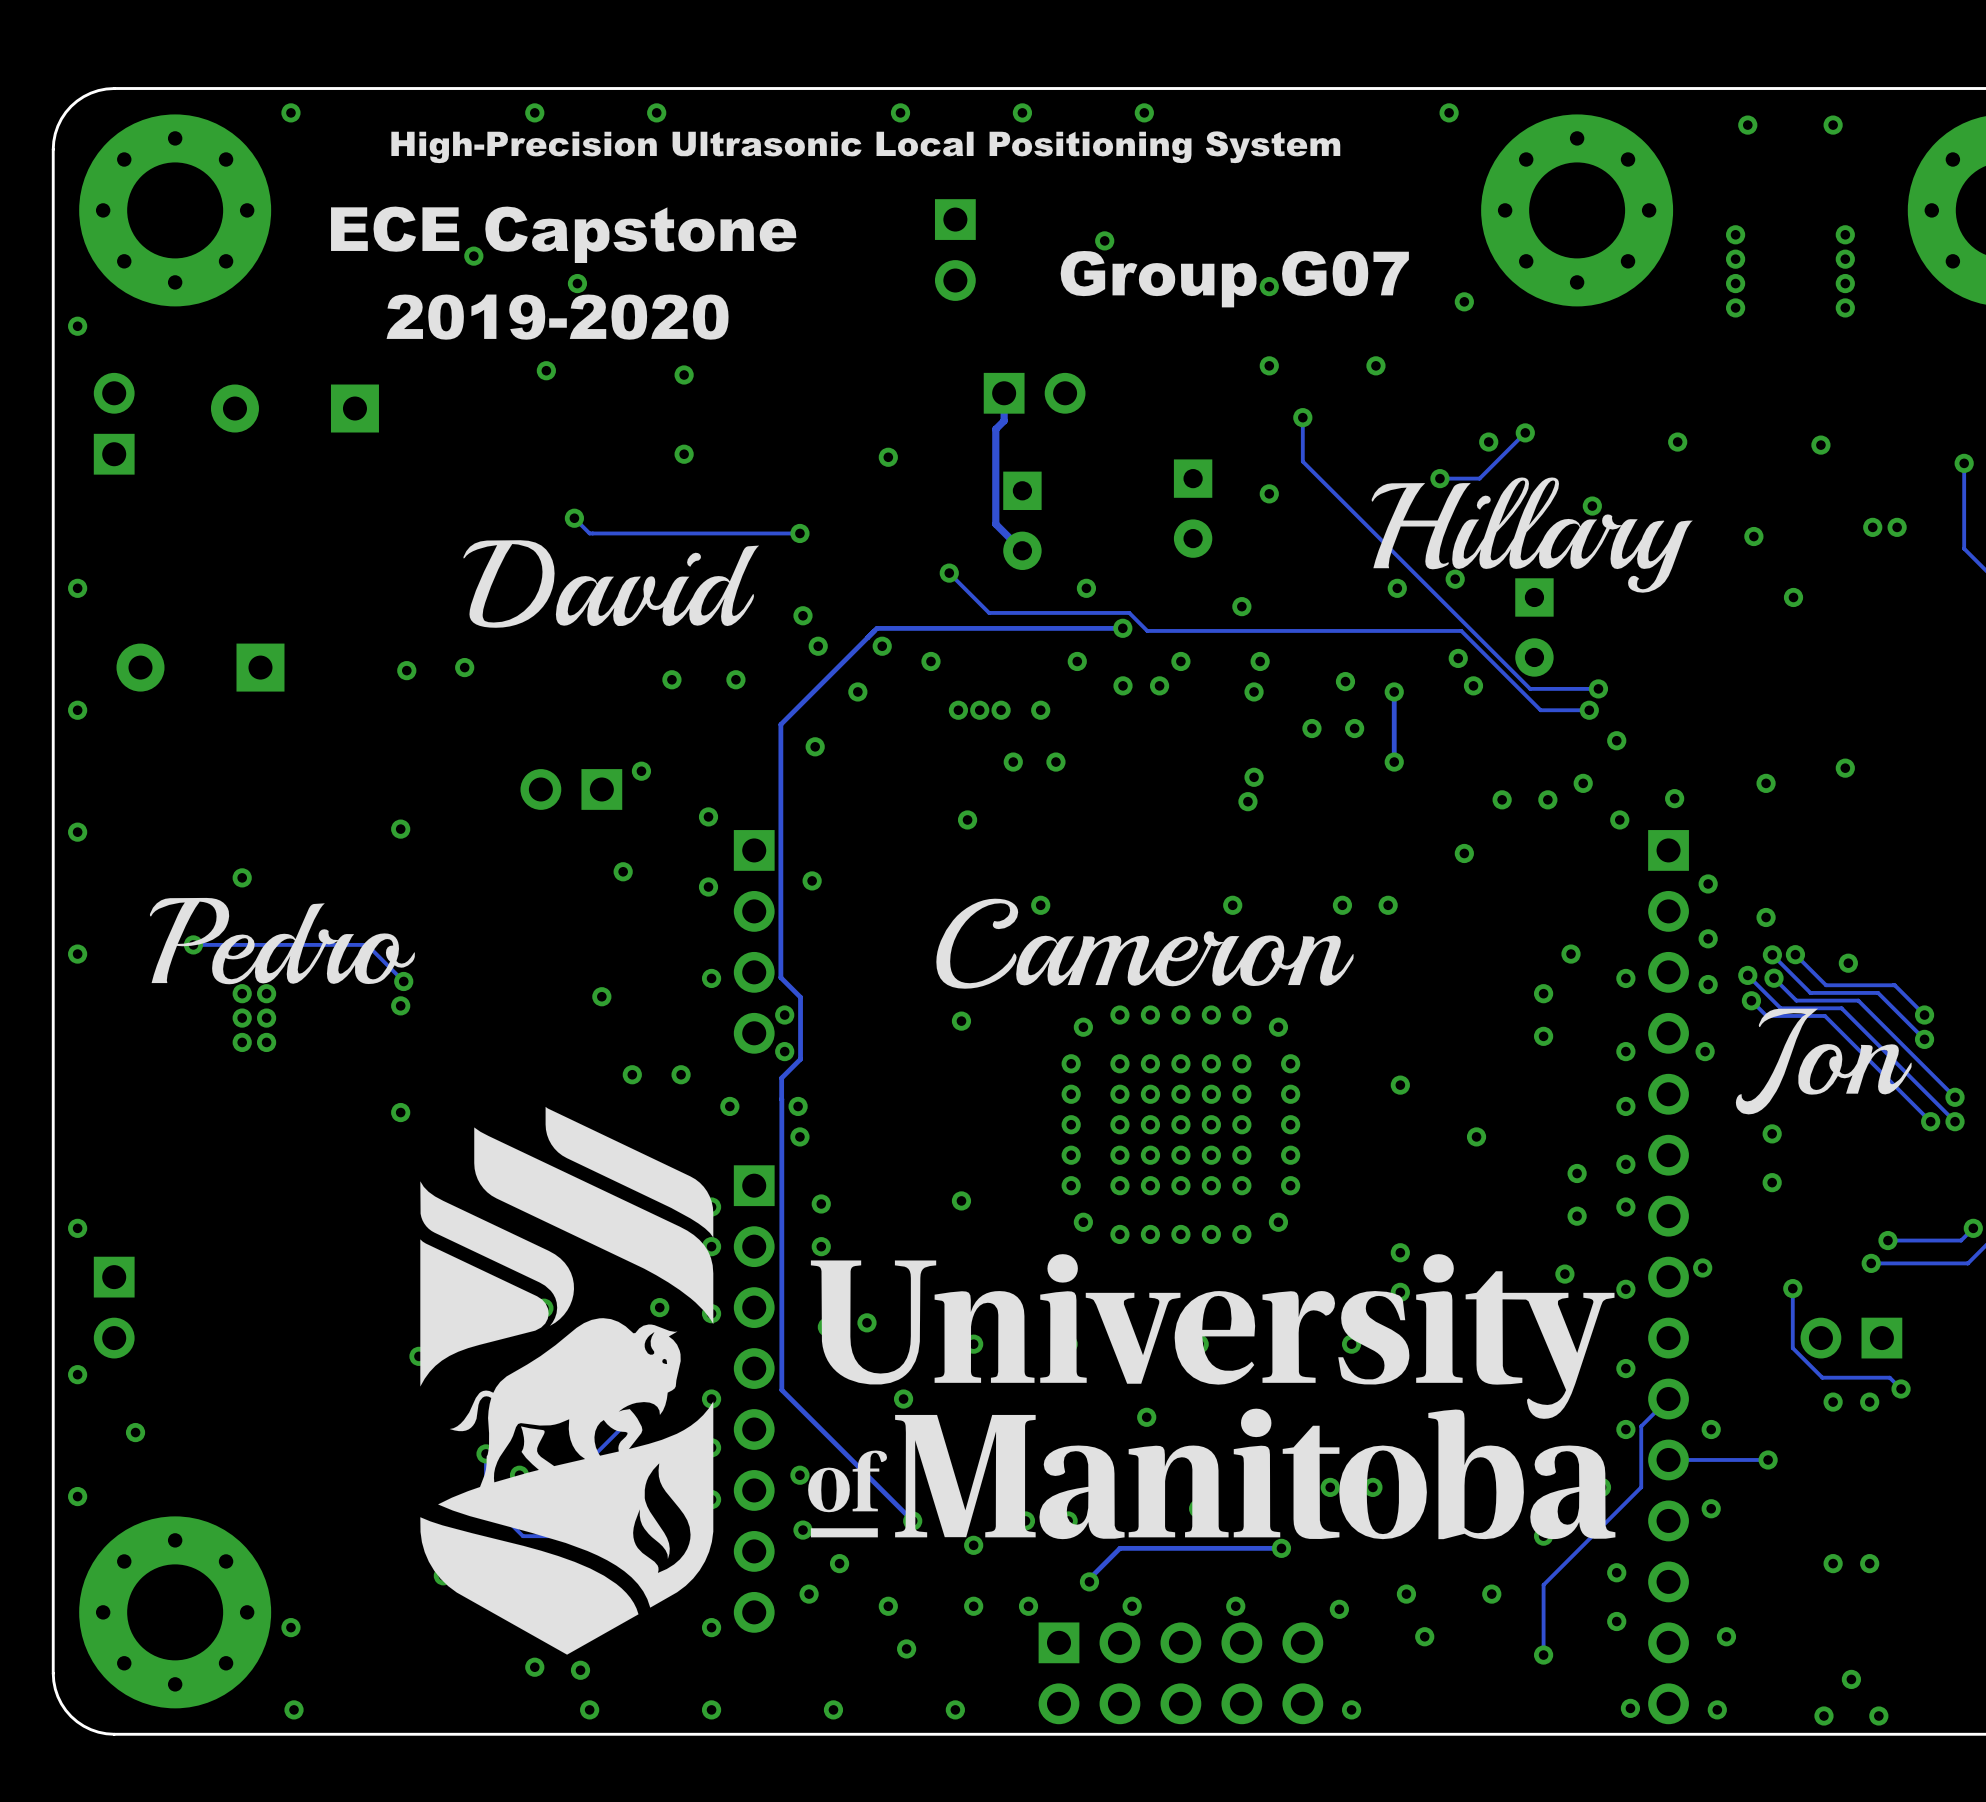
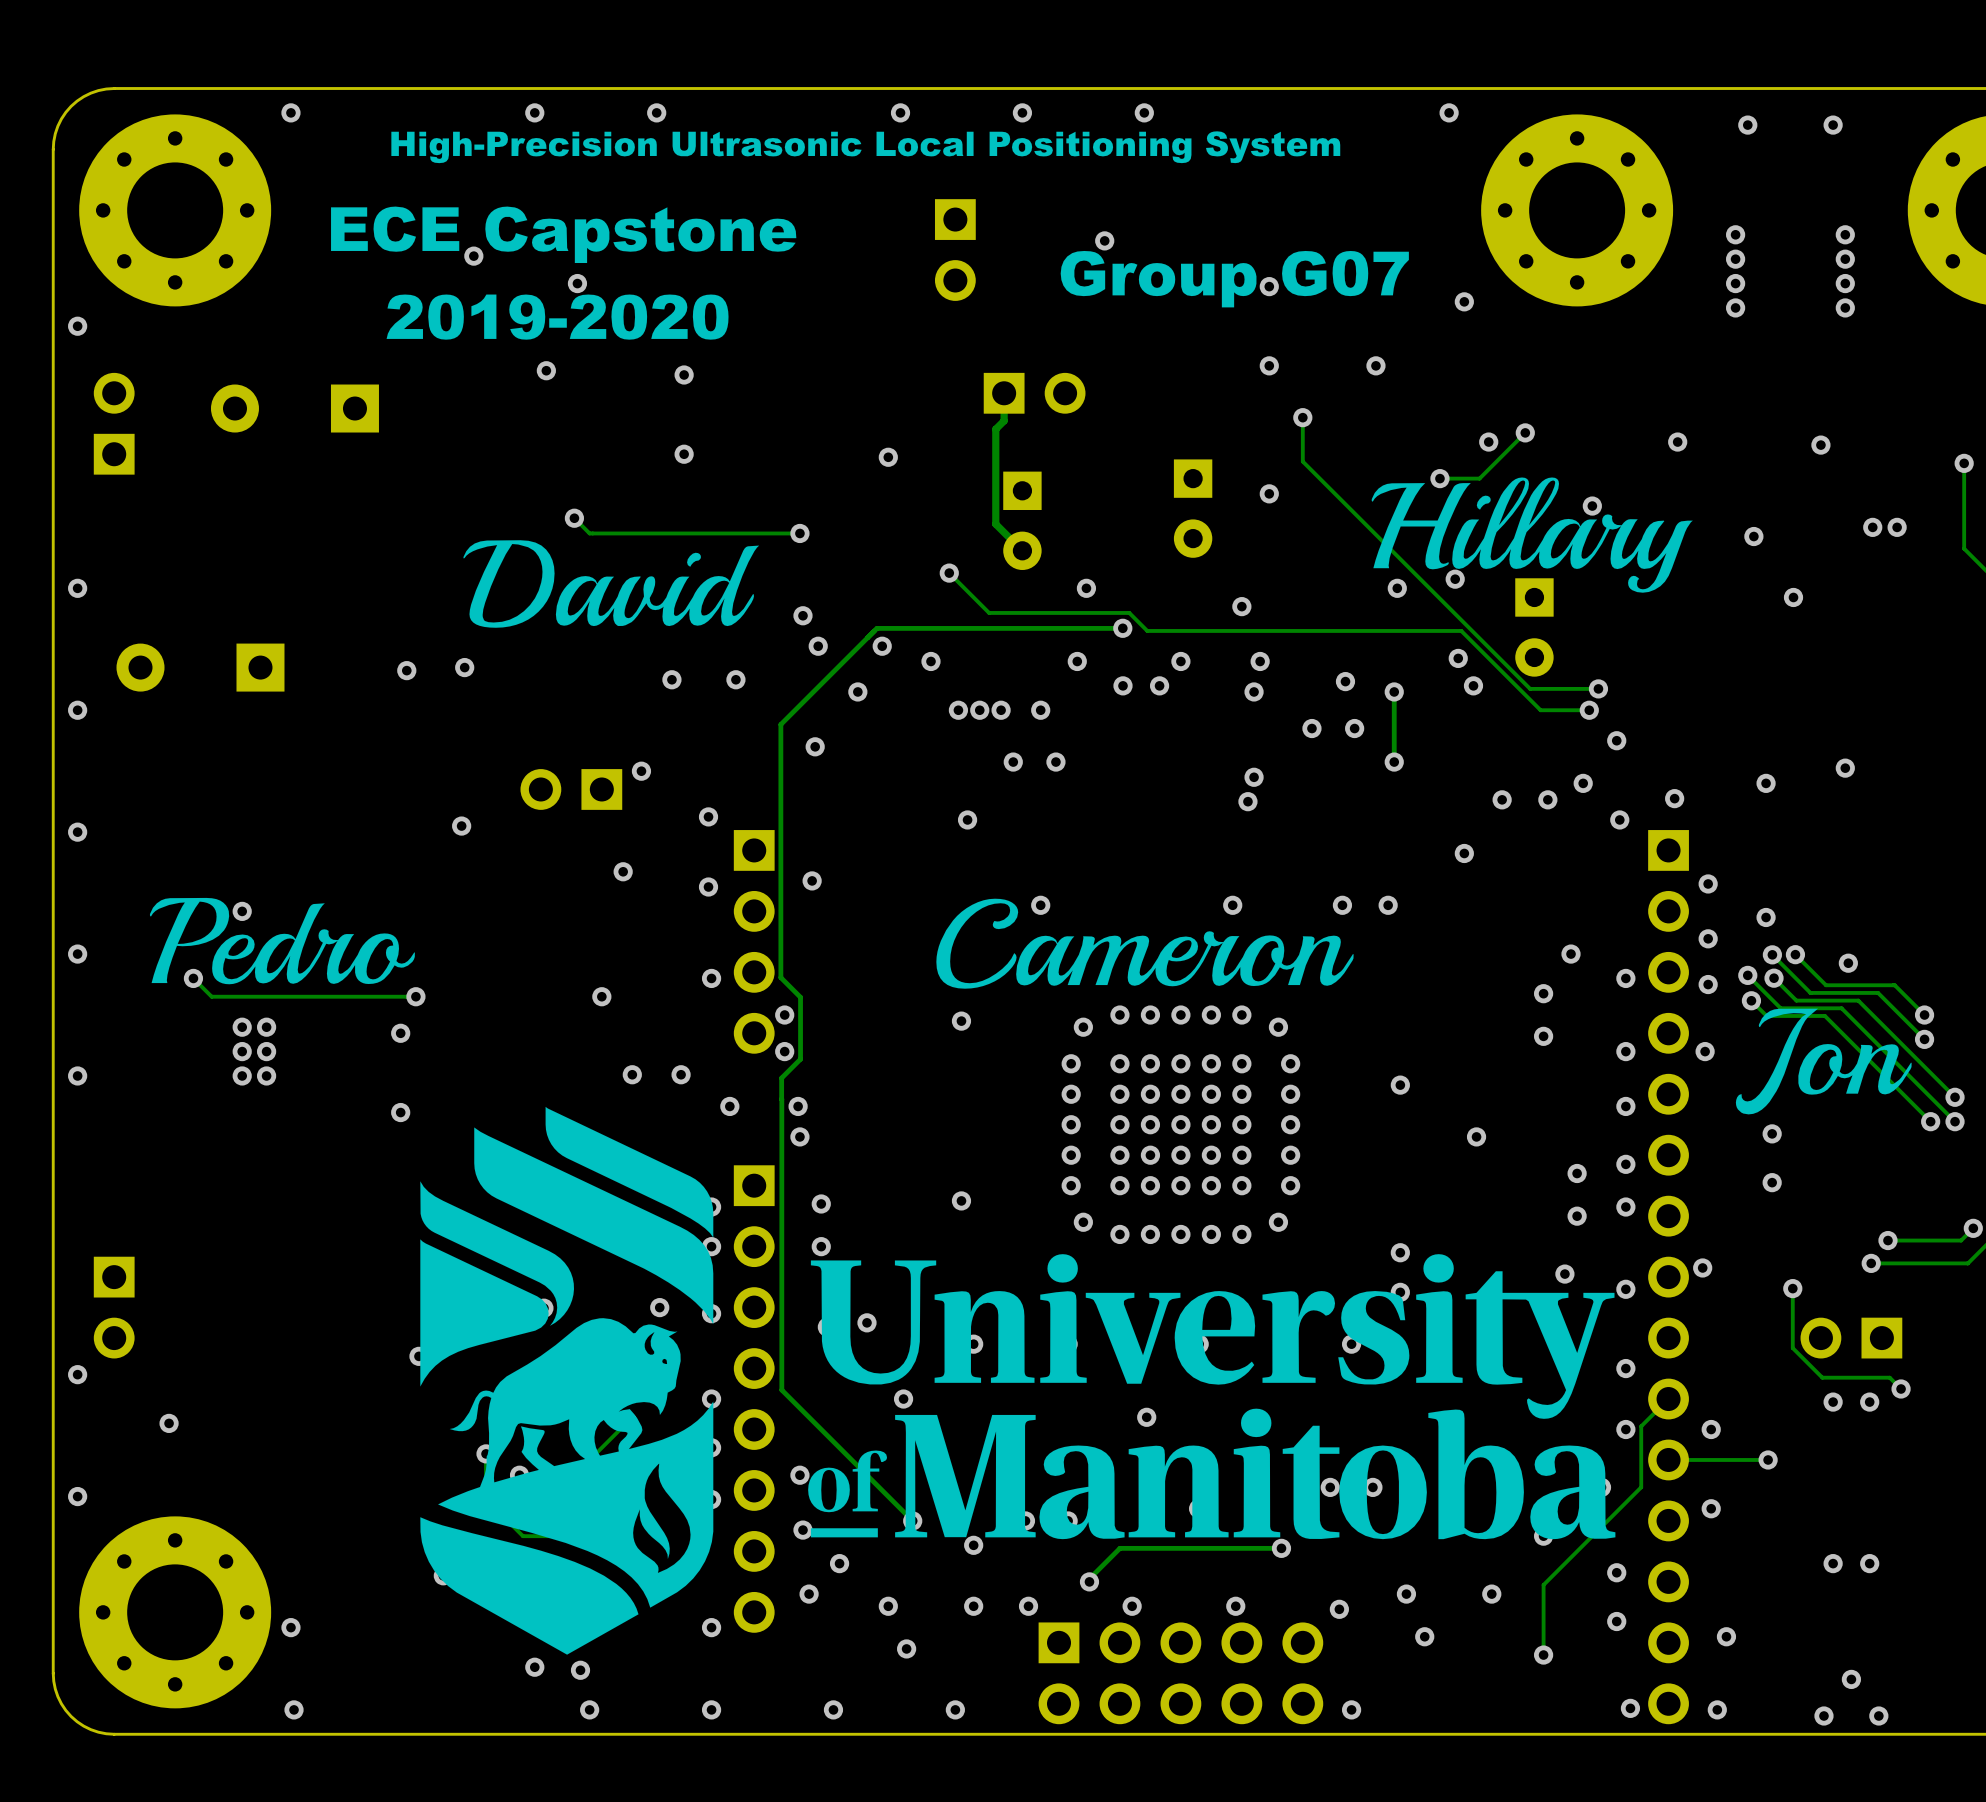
via position: (400, 829) -> (461, 826)
via: (242, 877) -> none
via: none -> (242, 911)
track: (193, 944) (367, 944) (403, 981) -> none
via: (193, 944) -> none
track: none -> (193, 978) (211, 996) (415, 996)
via: none -> (193, 978)
via: (403, 981) -> none
via: (242, 993) -> none
via: (266, 993) -> none
via: none -> (415, 996)
via: (400, 1005) -> none
via: (242, 1018) -> none
via: (266, 1018) -> none
via: none -> (242, 1027)
via: none -> (266, 1027)
via: none -> (400, 1033)
via: (242, 1042) -> none
via: (266, 1042) -> none
via: none -> (242, 1051)
via: none -> (266, 1051)
via: none -> (77, 1075)
via: none -> (242, 1075)
via: none -> (266, 1075)
via: (77, 1228) -> none
via position: (135, 1432) -> (169, 1423)

